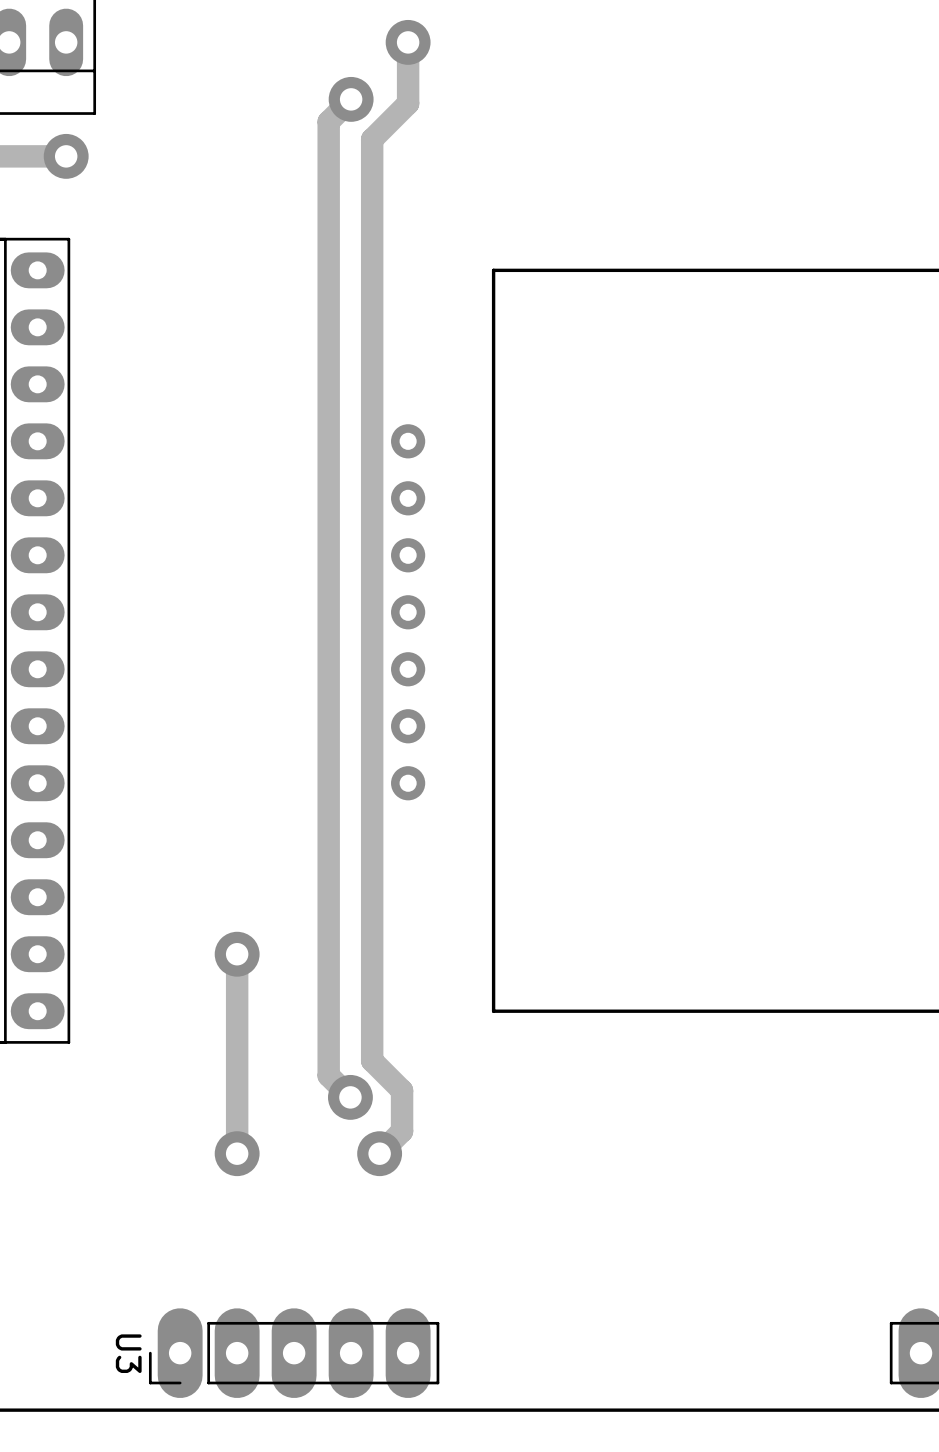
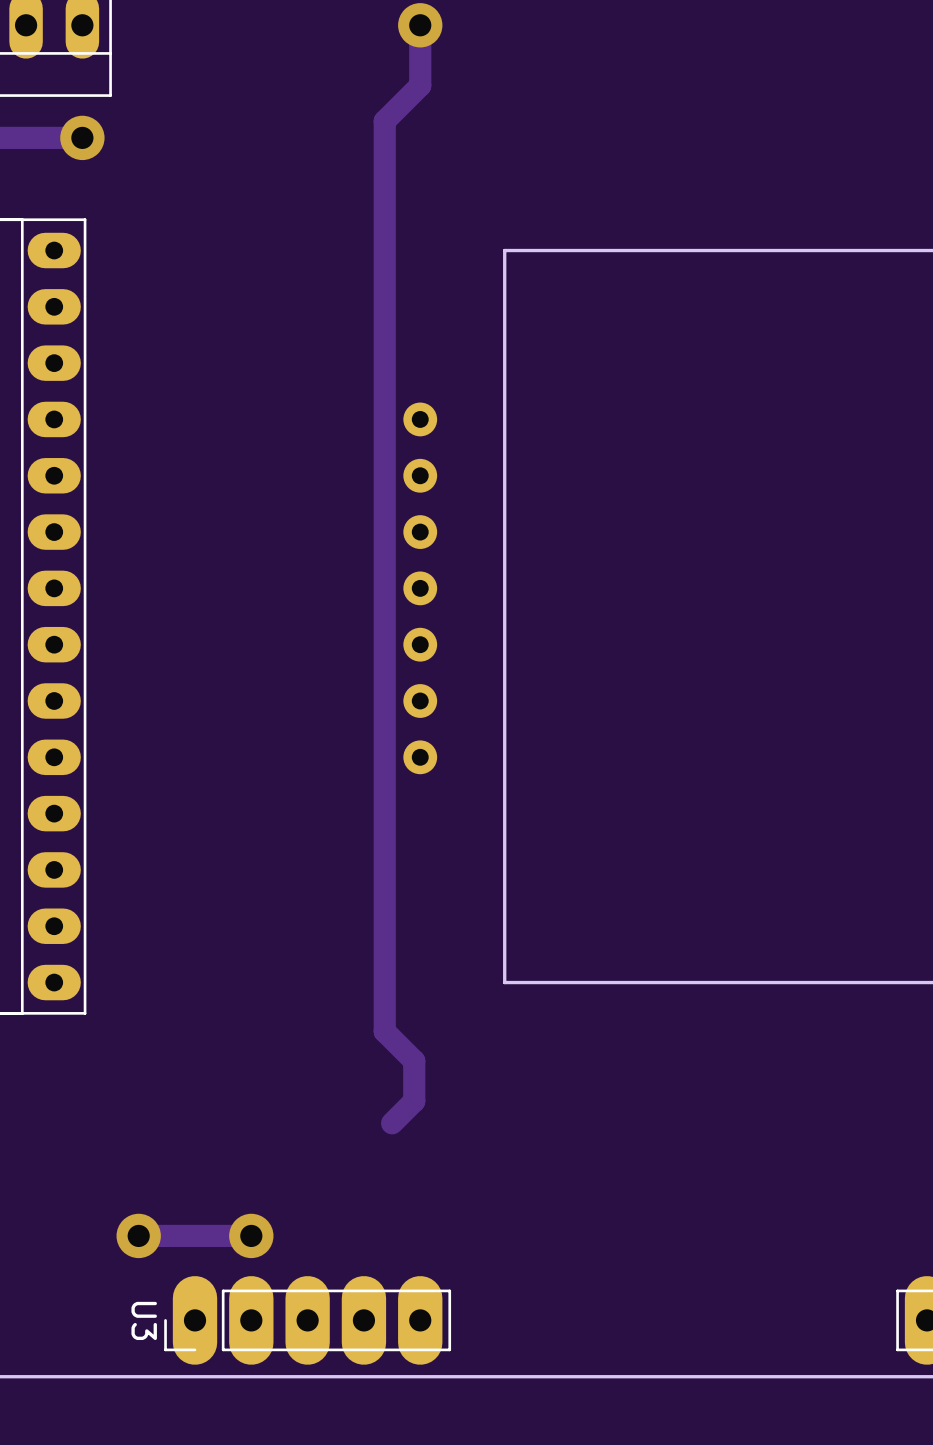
track: (351, 99) (328, 121) (328, 1075) (350, 1097) -> none
via: (351, 99) -> none
track: (237, 954) (237, 1153) -> none
via: (237, 954) -> none
via: (350, 1097) -> none
via: (237, 1153) -> none
via: (379, 1153) -> none
via: none -> (138, 1235)
track: none -> (251, 1235) (138, 1235)
via: none -> (251, 1235)

